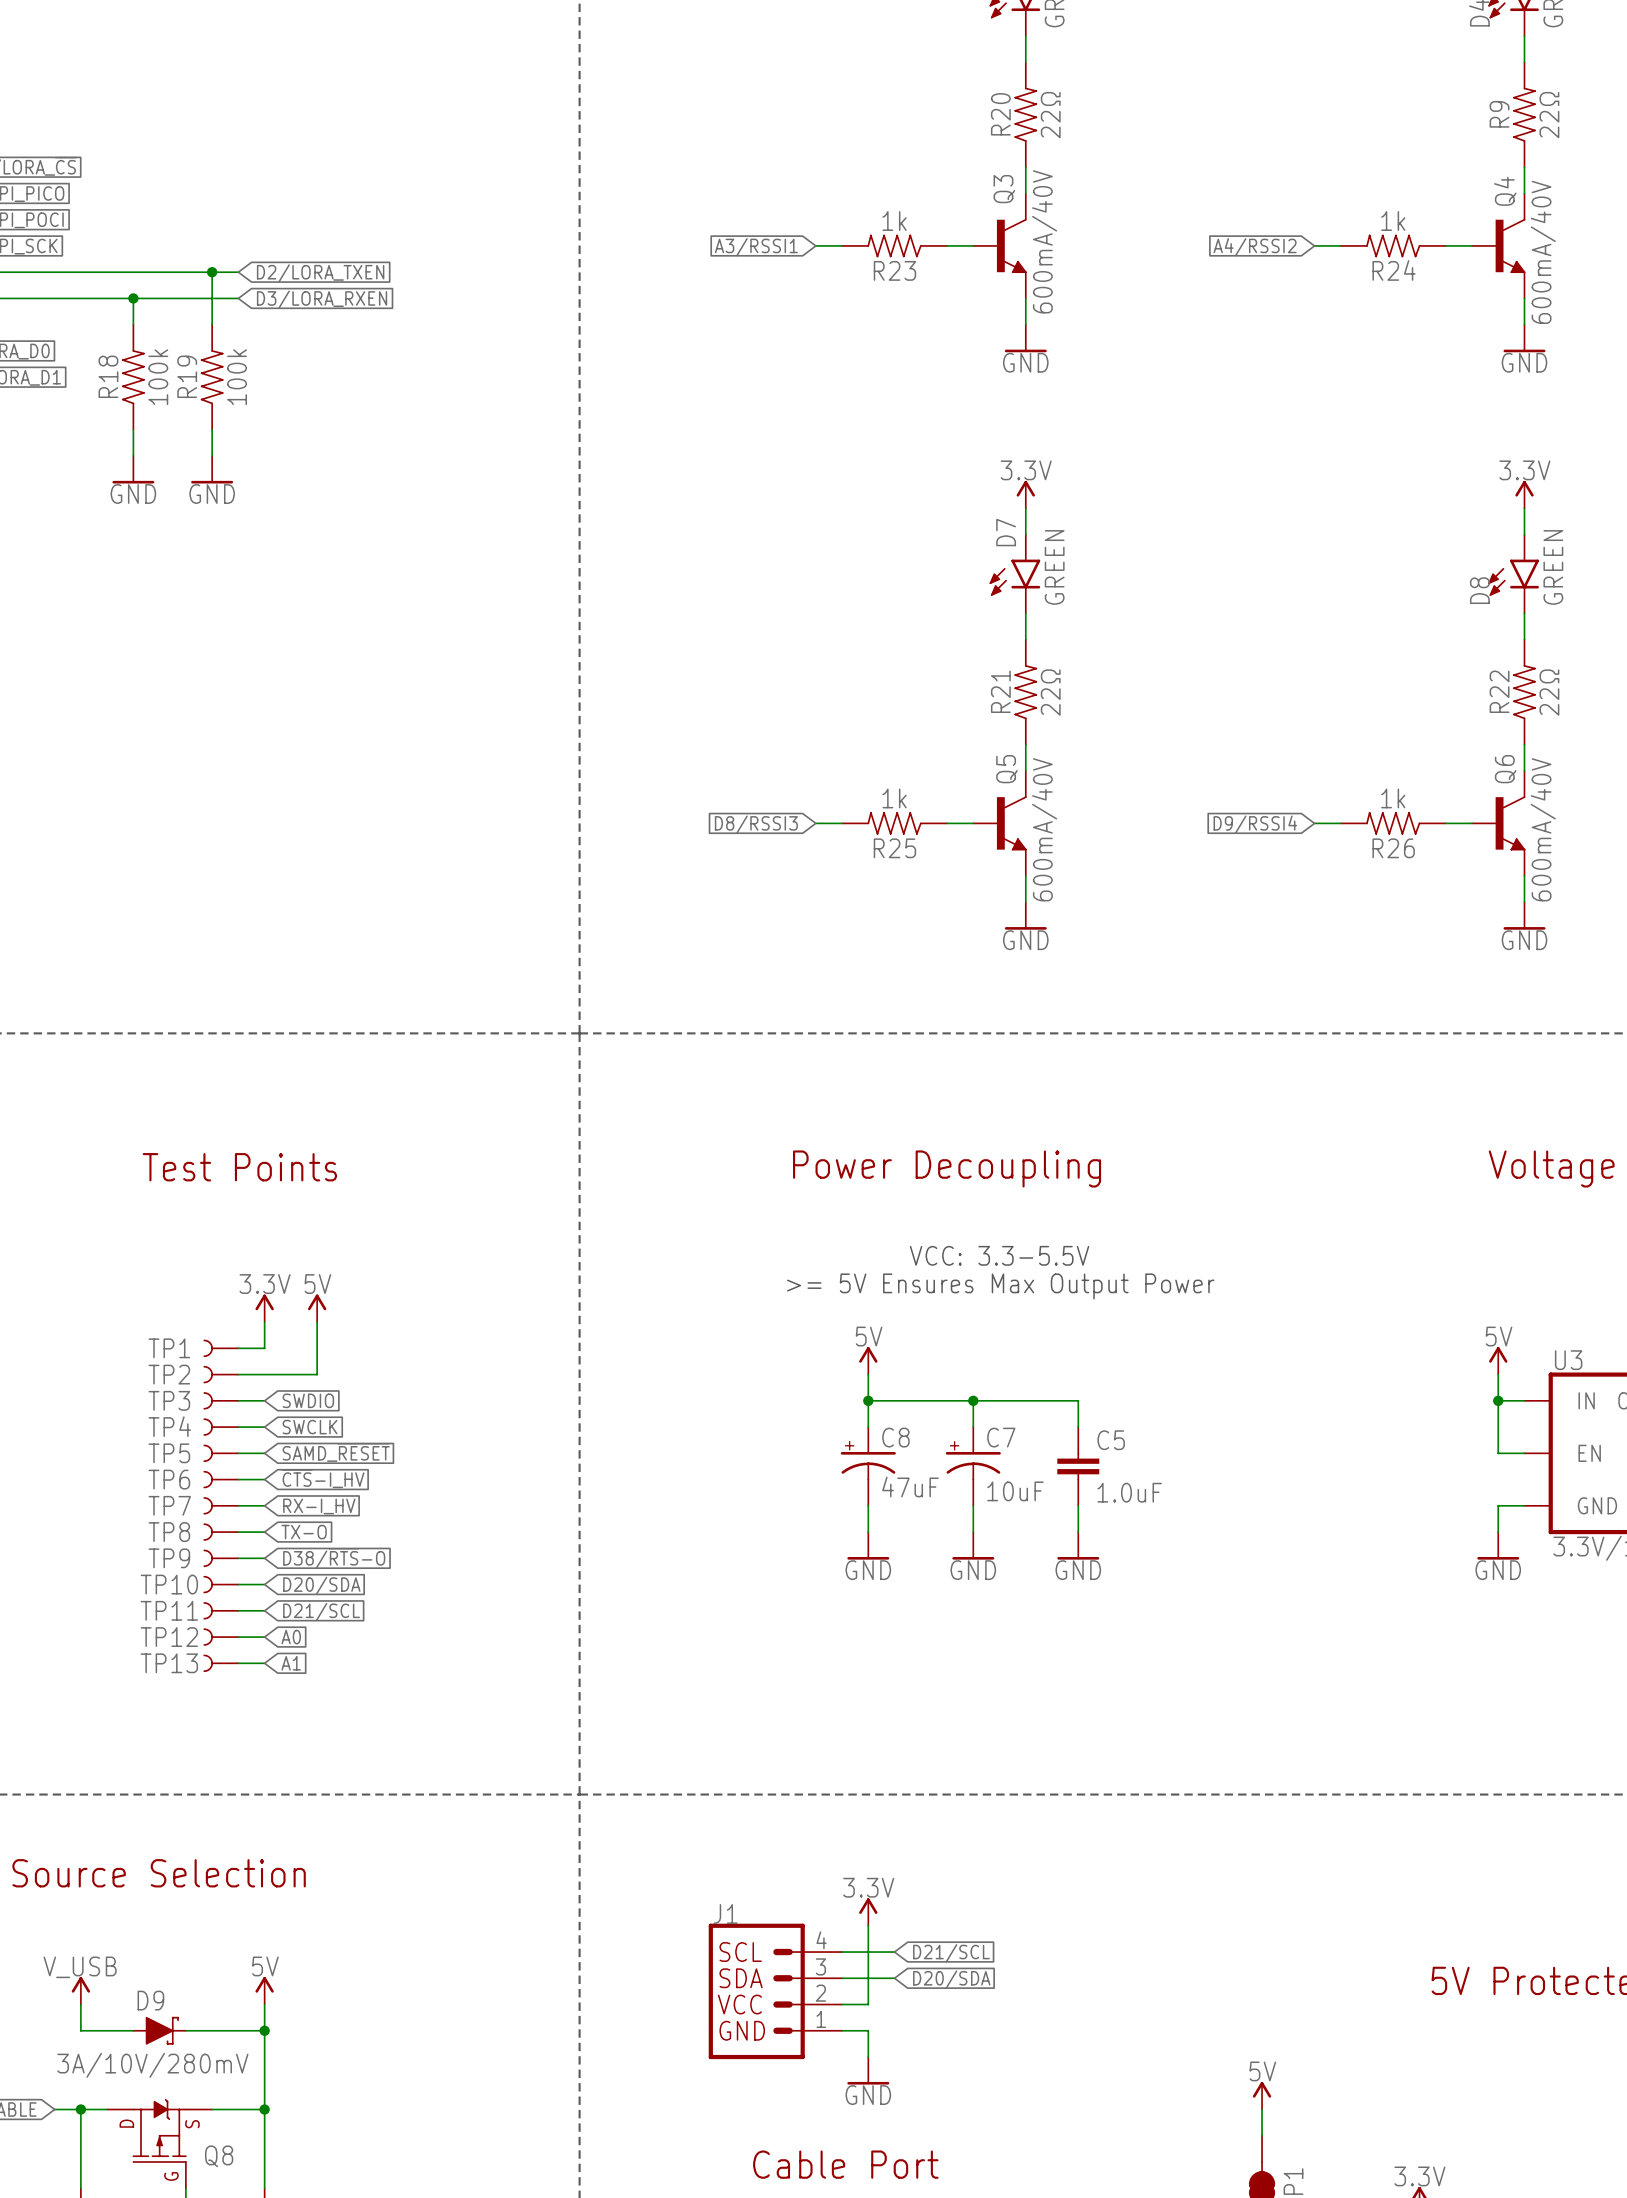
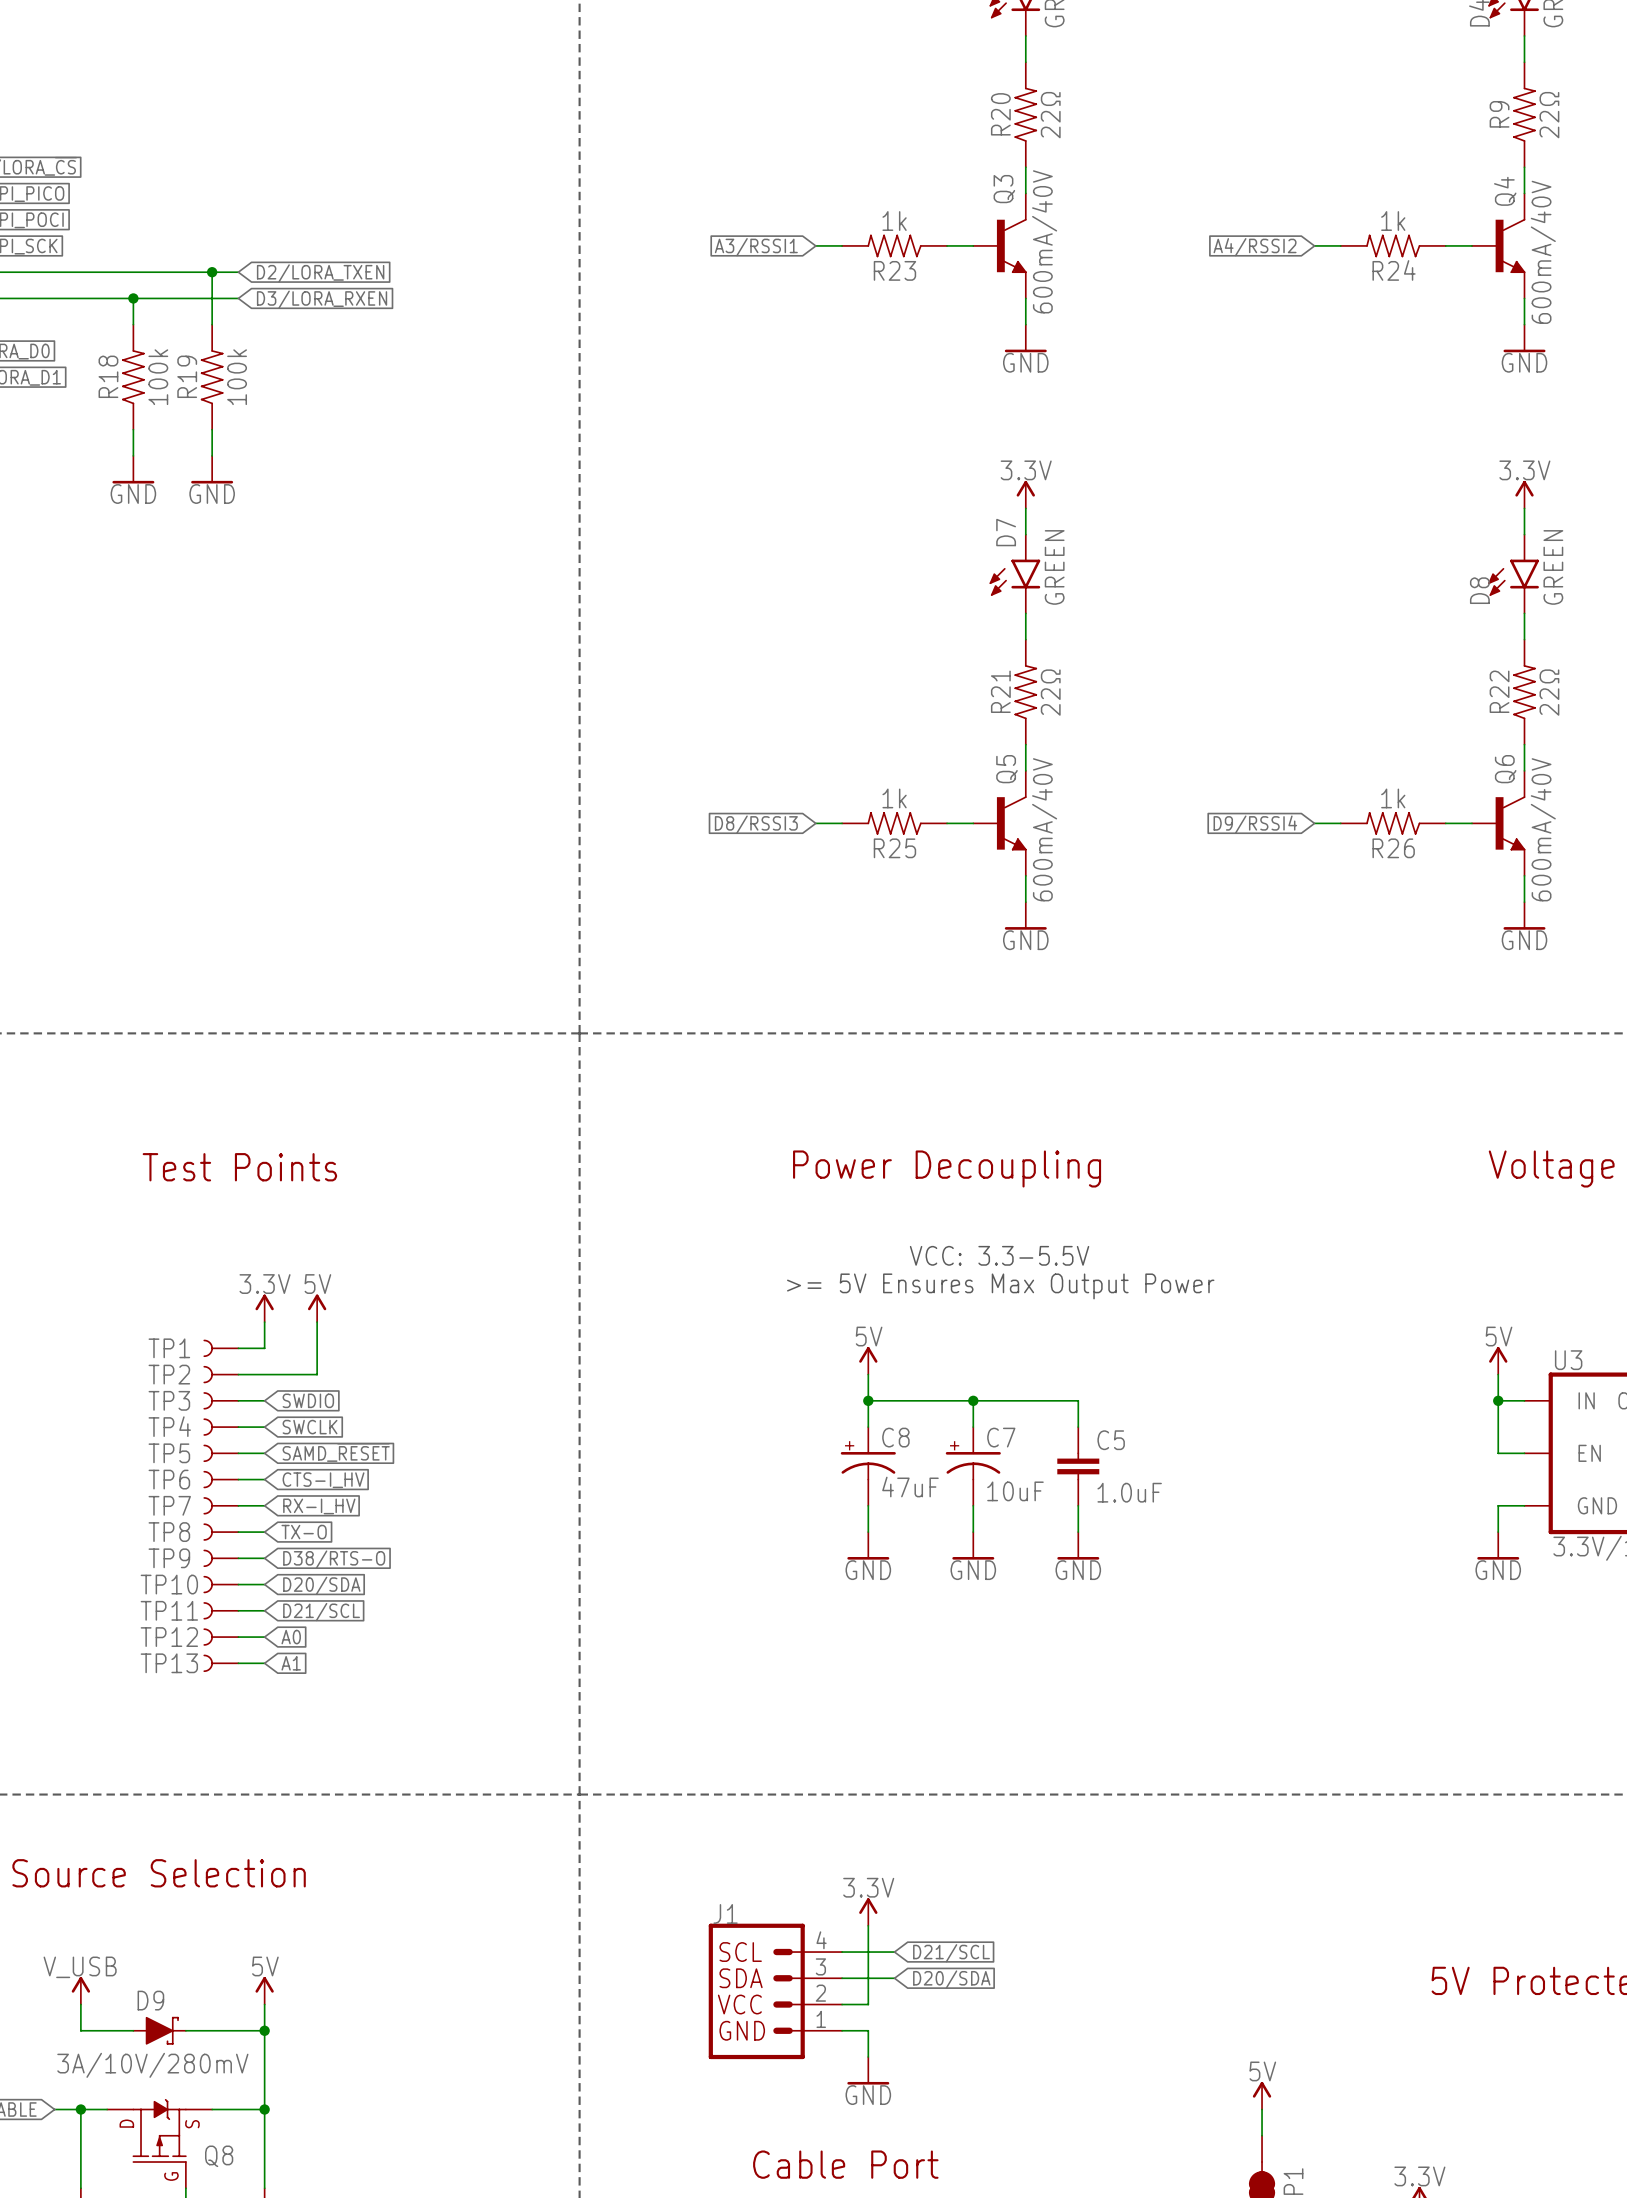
global label: ~{CTS}-I_HV (322, 1478) -> CTS-I_HV (323, 1480)
global label: D38/~{RTS}-O (334, 1558) -> D38/RTS-O (334, 1559)

